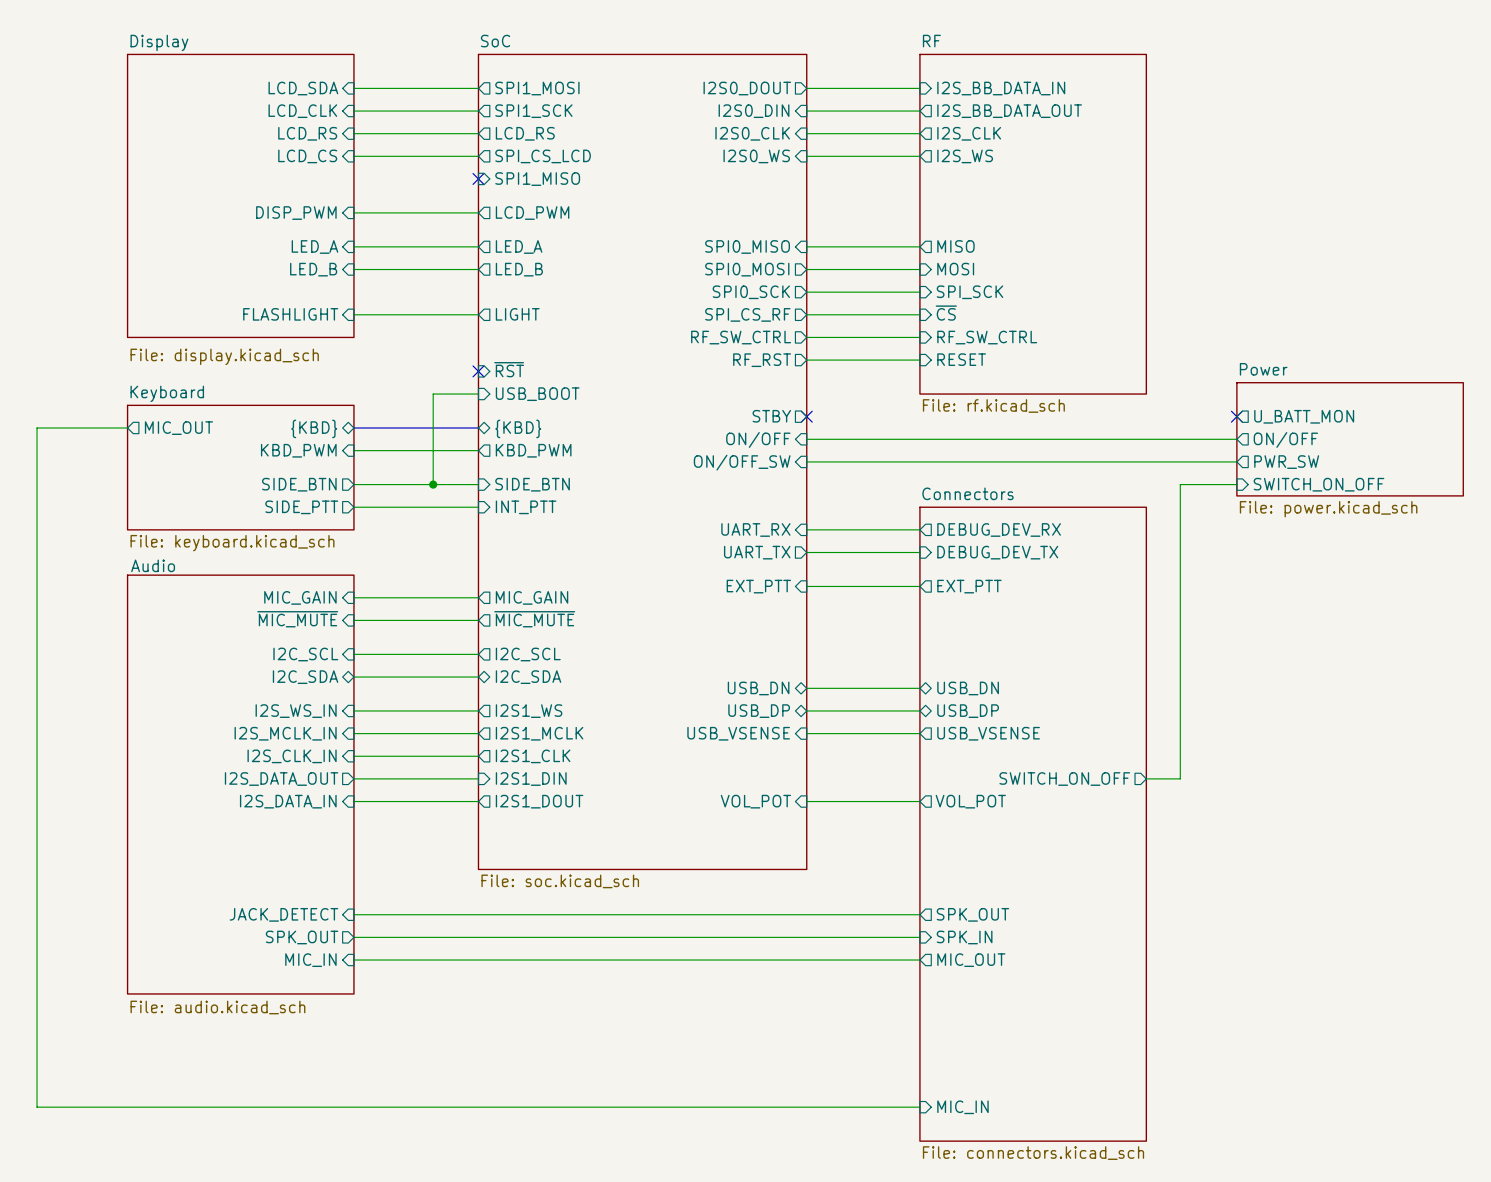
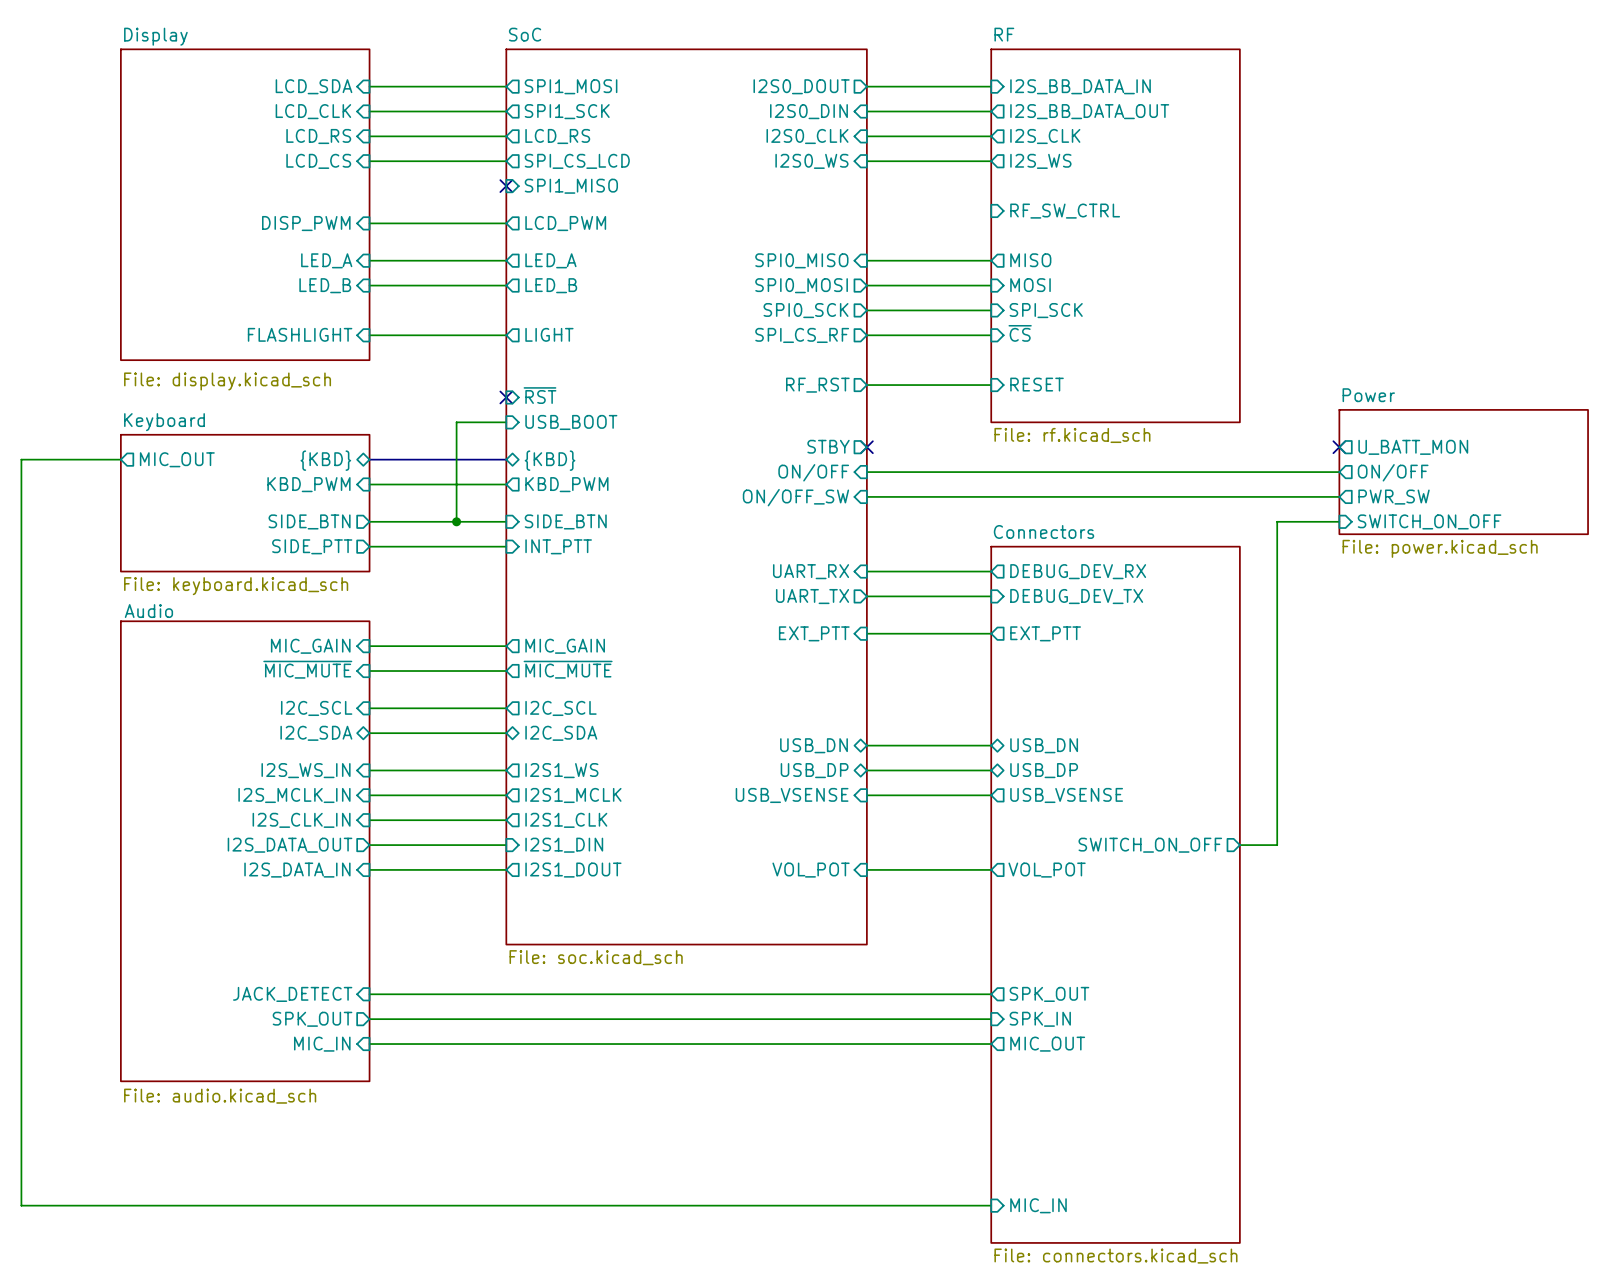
sheet pin: none -> RF_SW_CTRL (1065, 211)
sheet pin: RF_SW_CTRL (741, 337) -> none
wire: (806, 337) (919, 337) -> none
sheet pin: RF_SW_CTRL (987, 337) -> none

